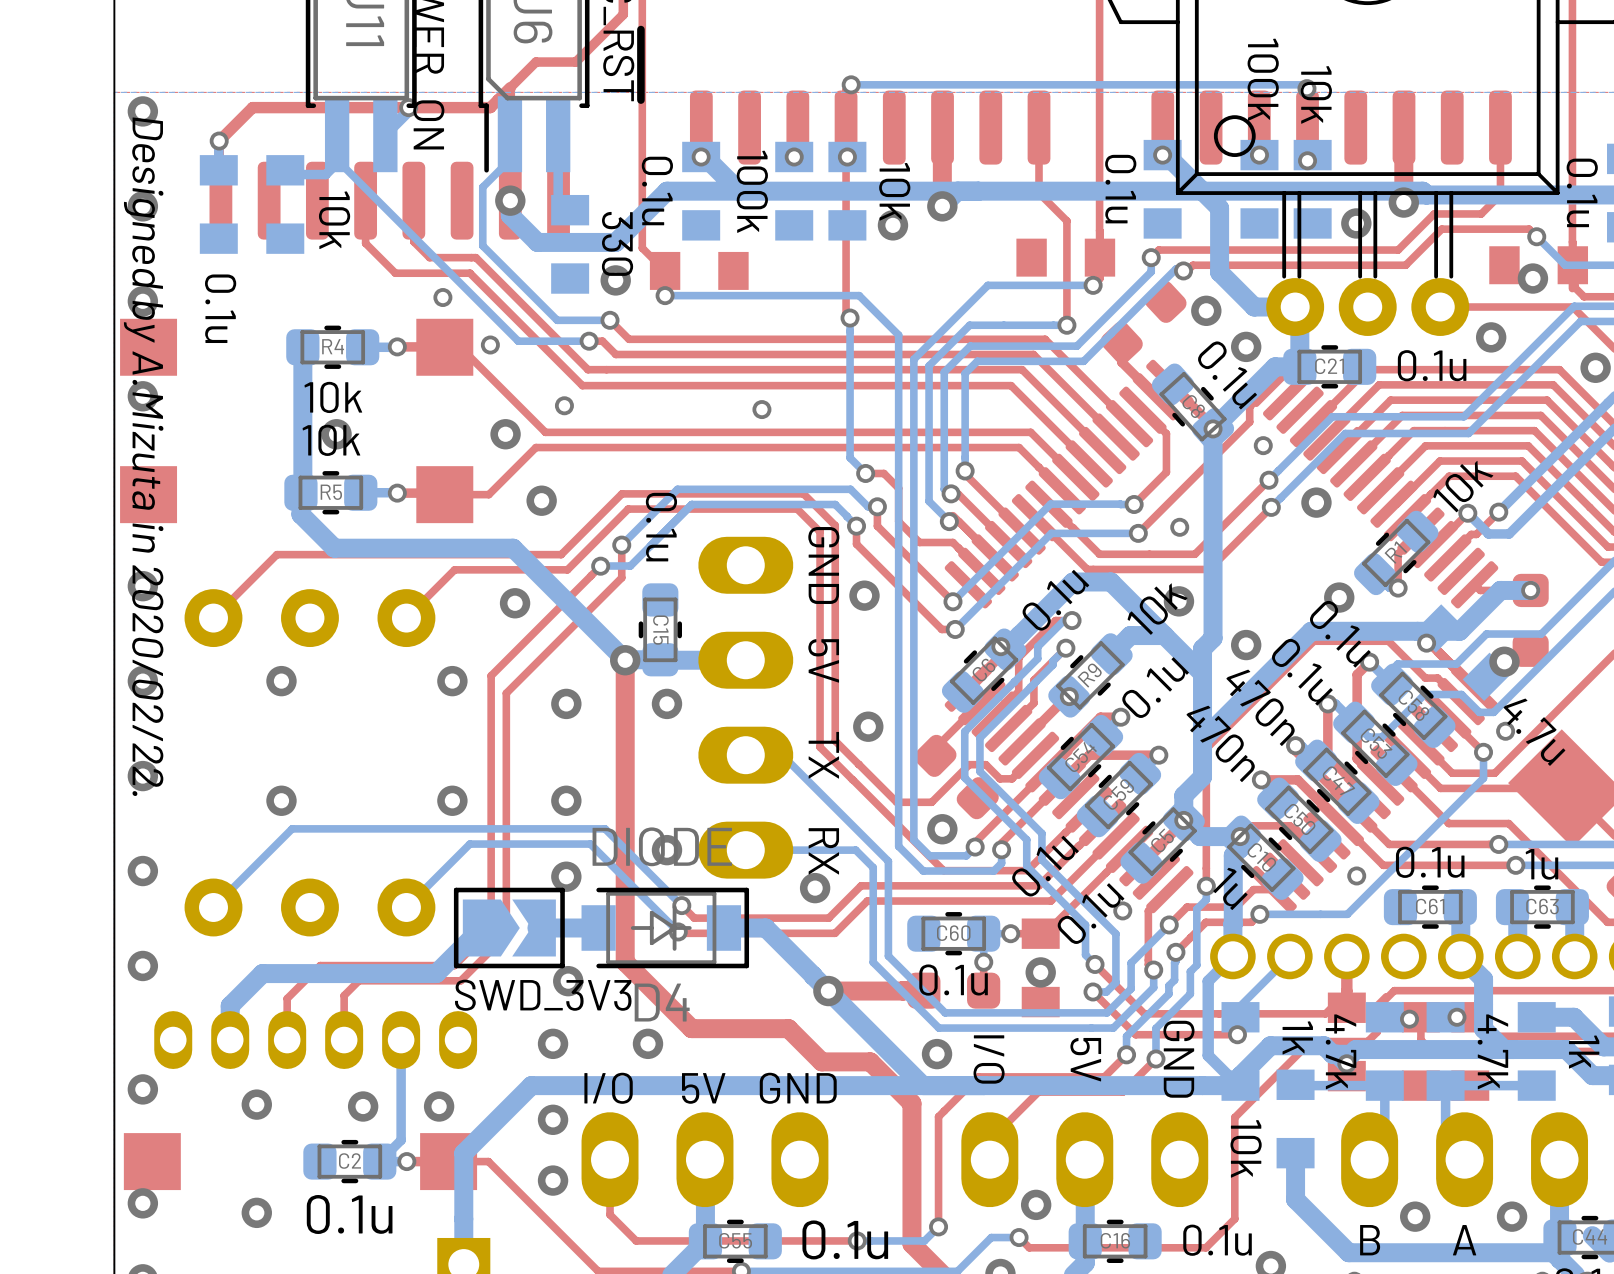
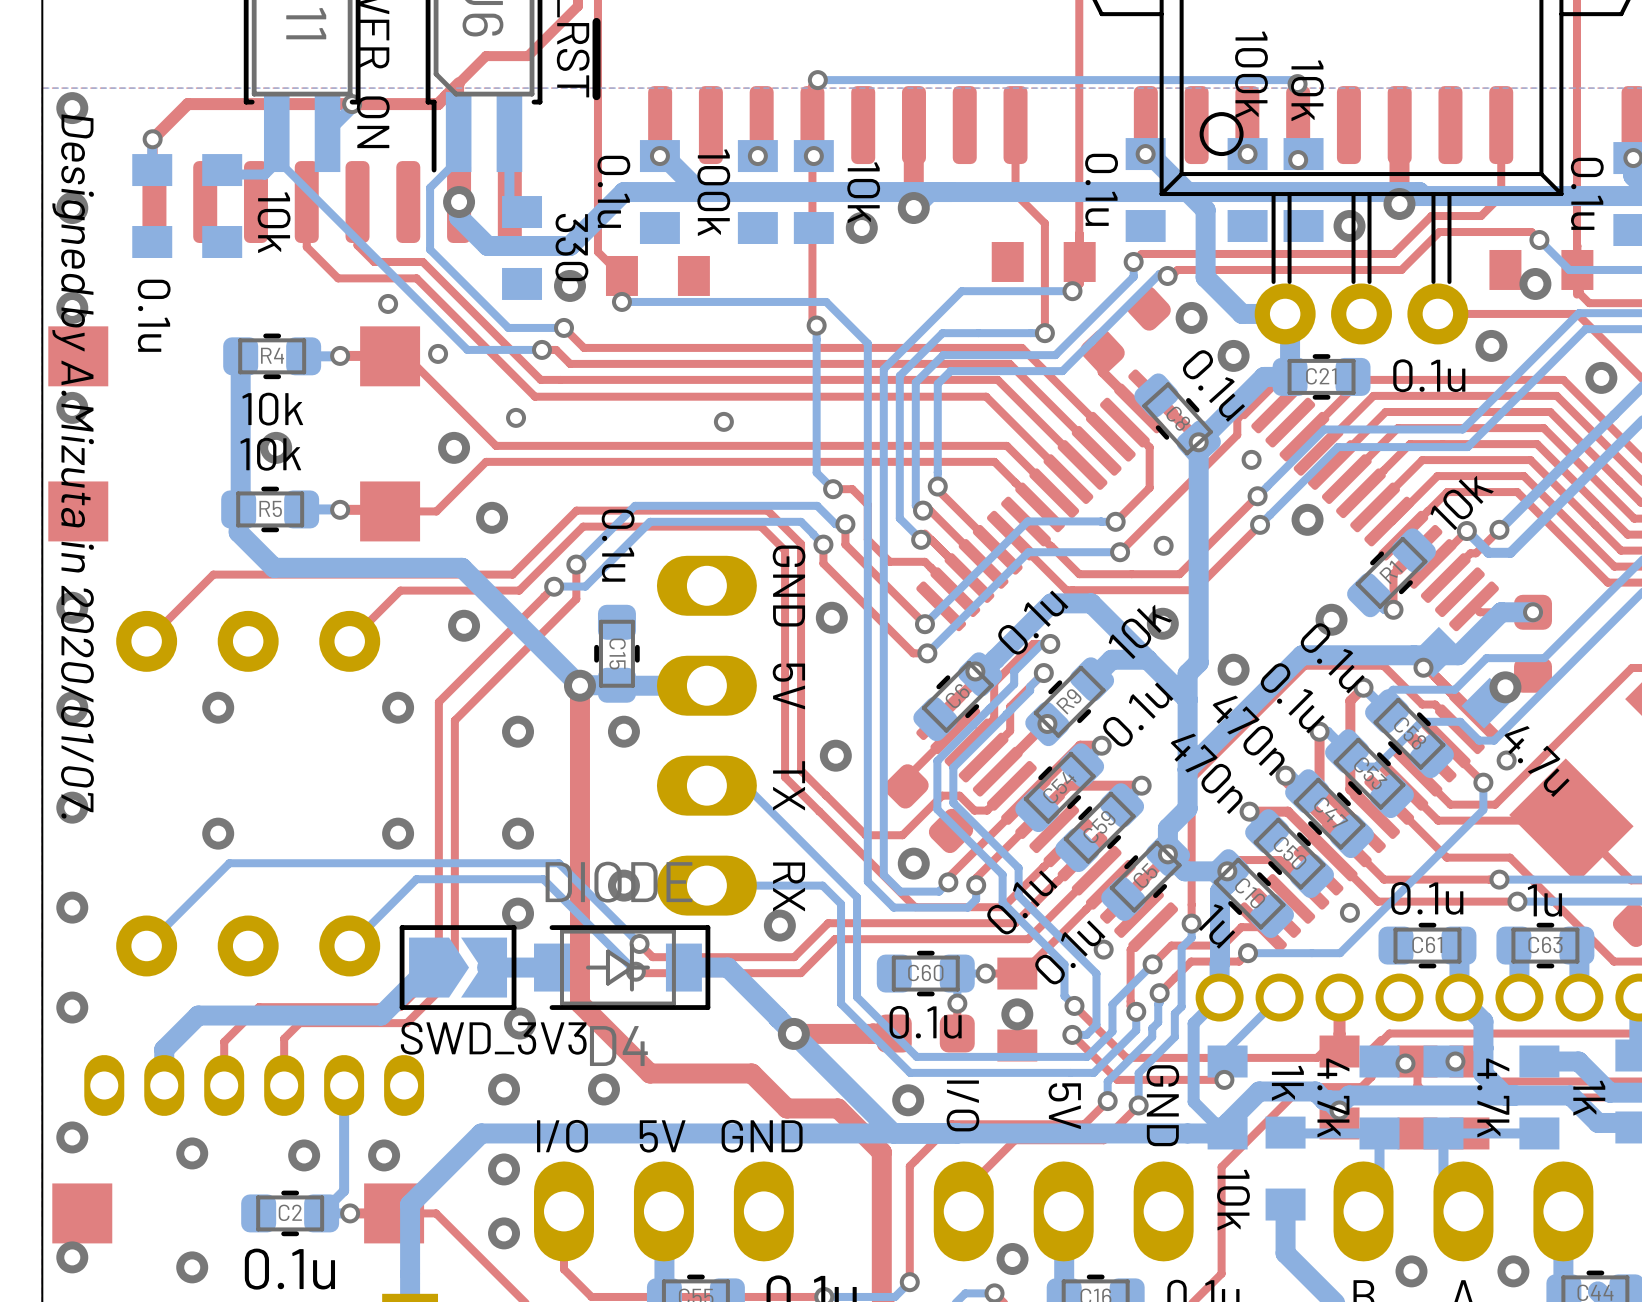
text: Designed by A.Mizuta in 2020/02/22. (143, 456) -> Designed by A.Mizuta in 2020/01/07. (73, 466)

